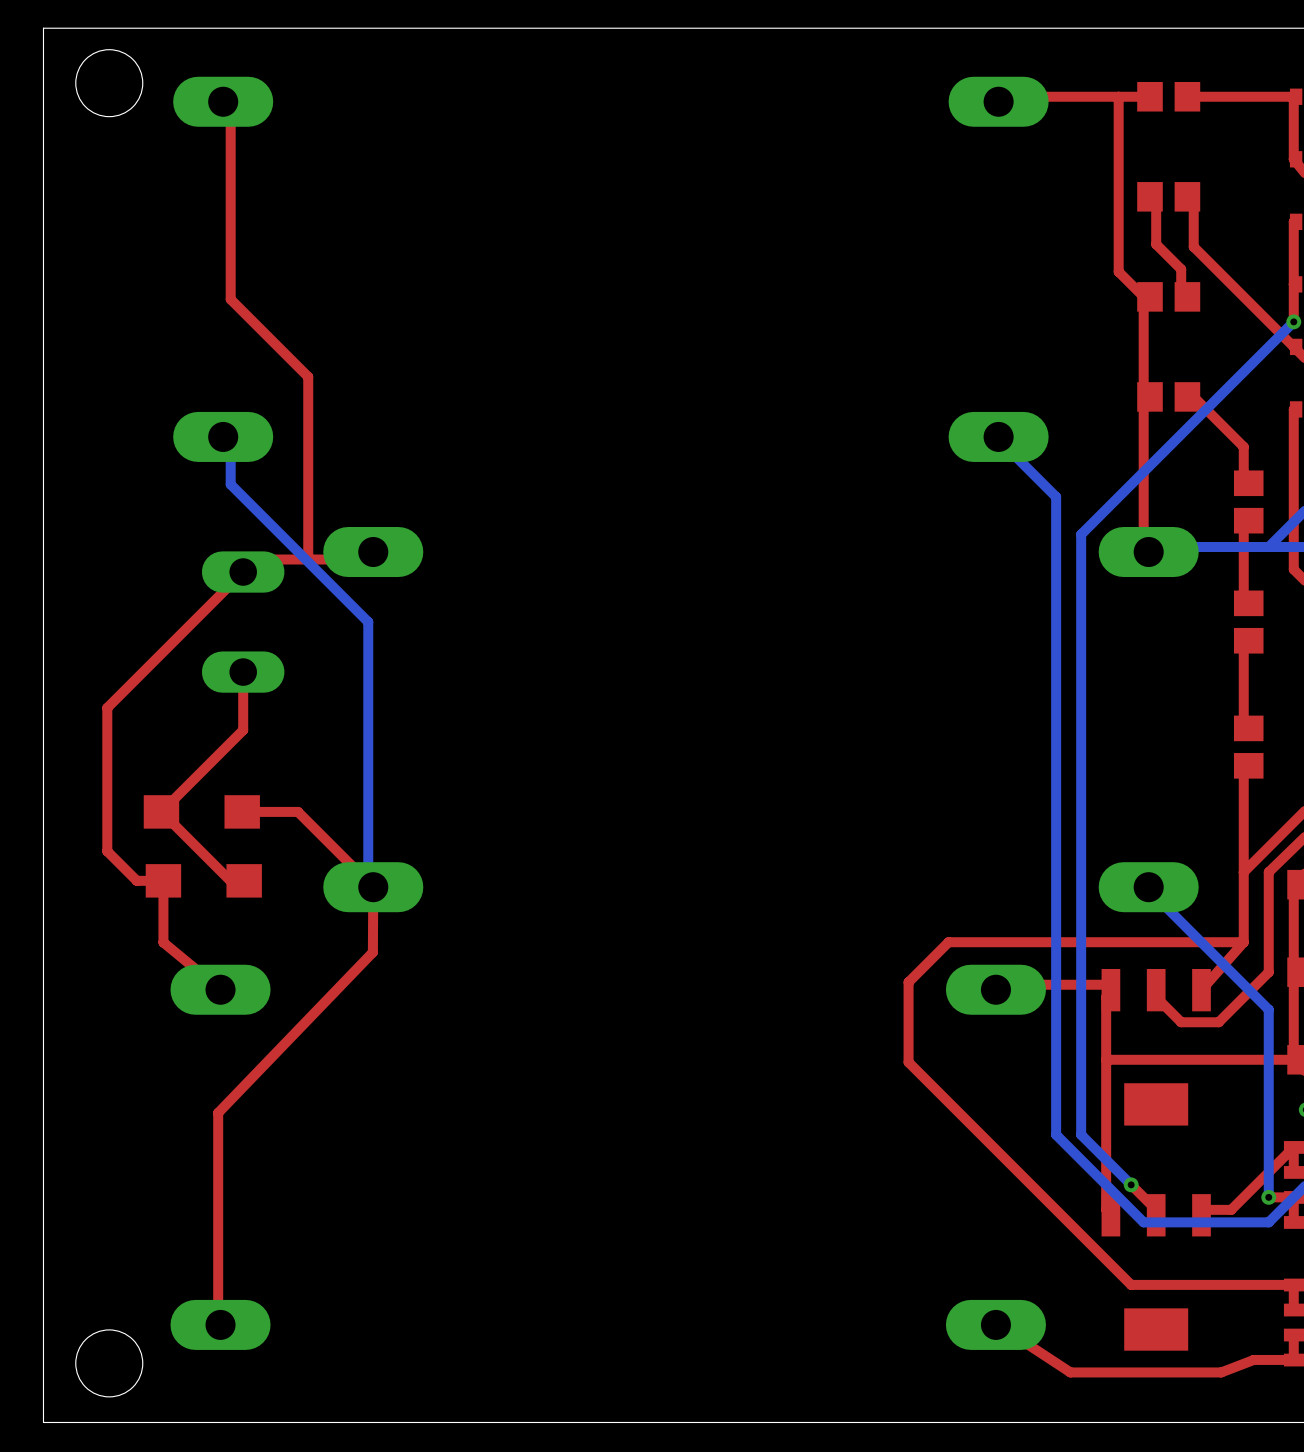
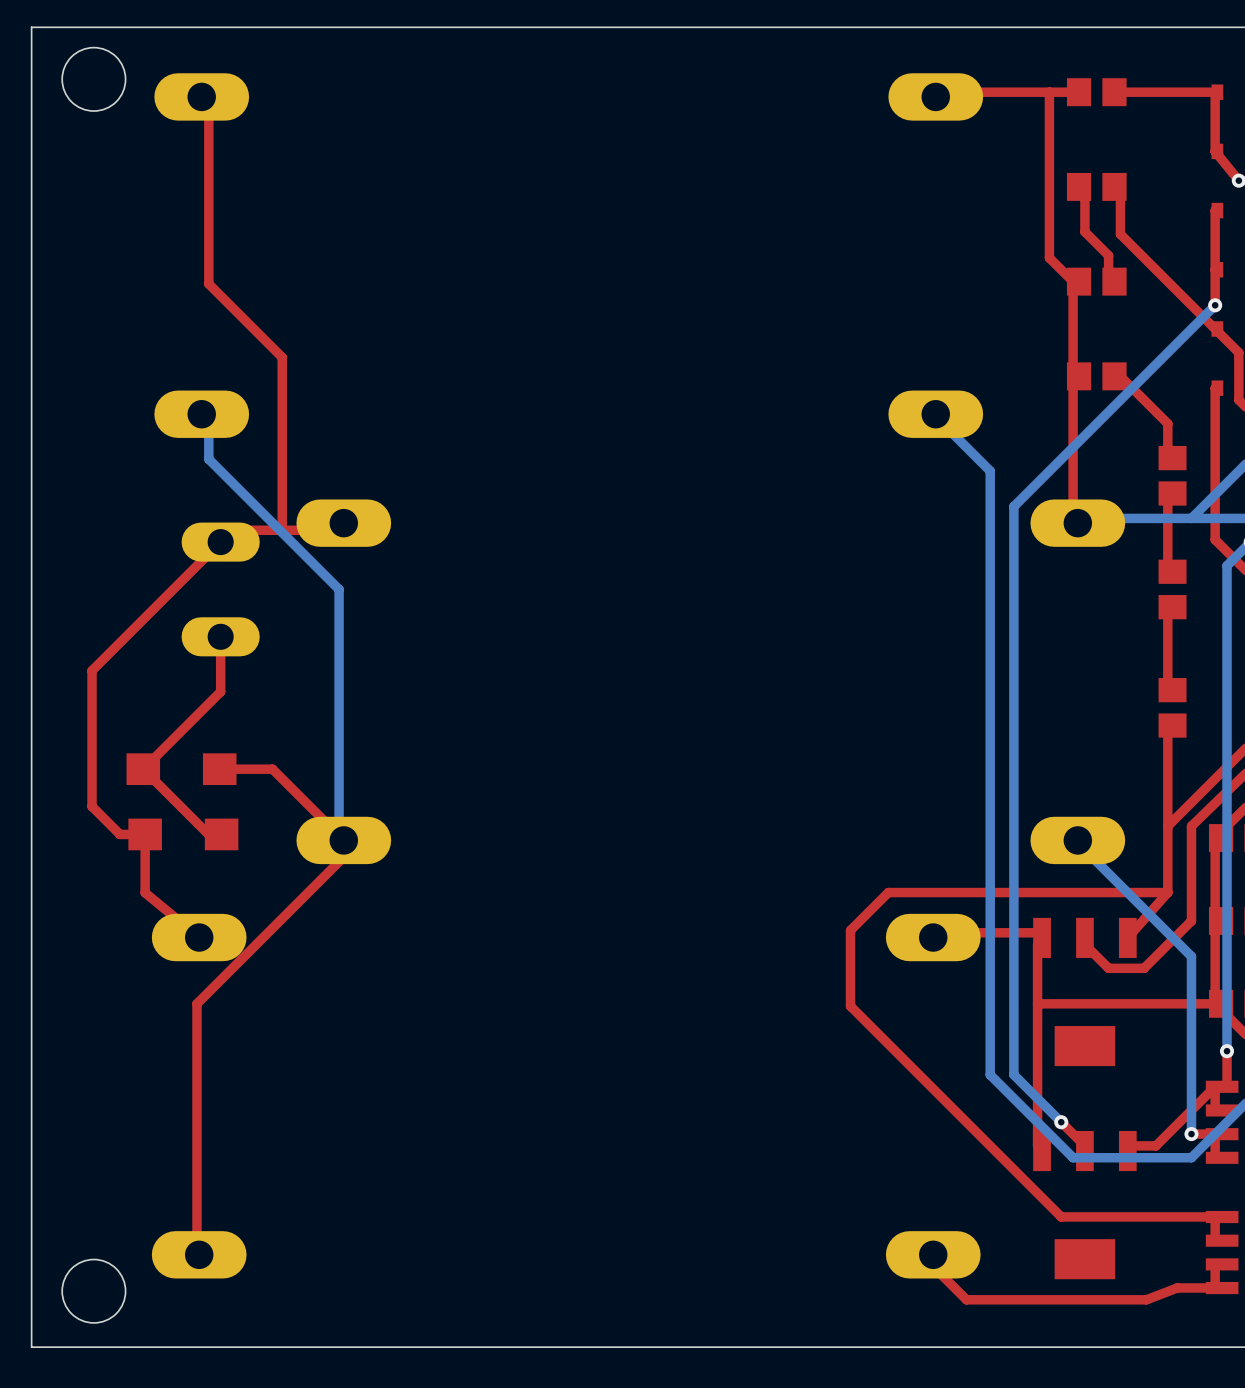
top track: (373, 887) (372, 952) (218, 1112) -> (343, 840) (350, 849) (196, 1003) (196, 1054)
top track: (995, 1324) (1070, 1372) -> (923, 1254) (966, 1299) (1003, 1299)

